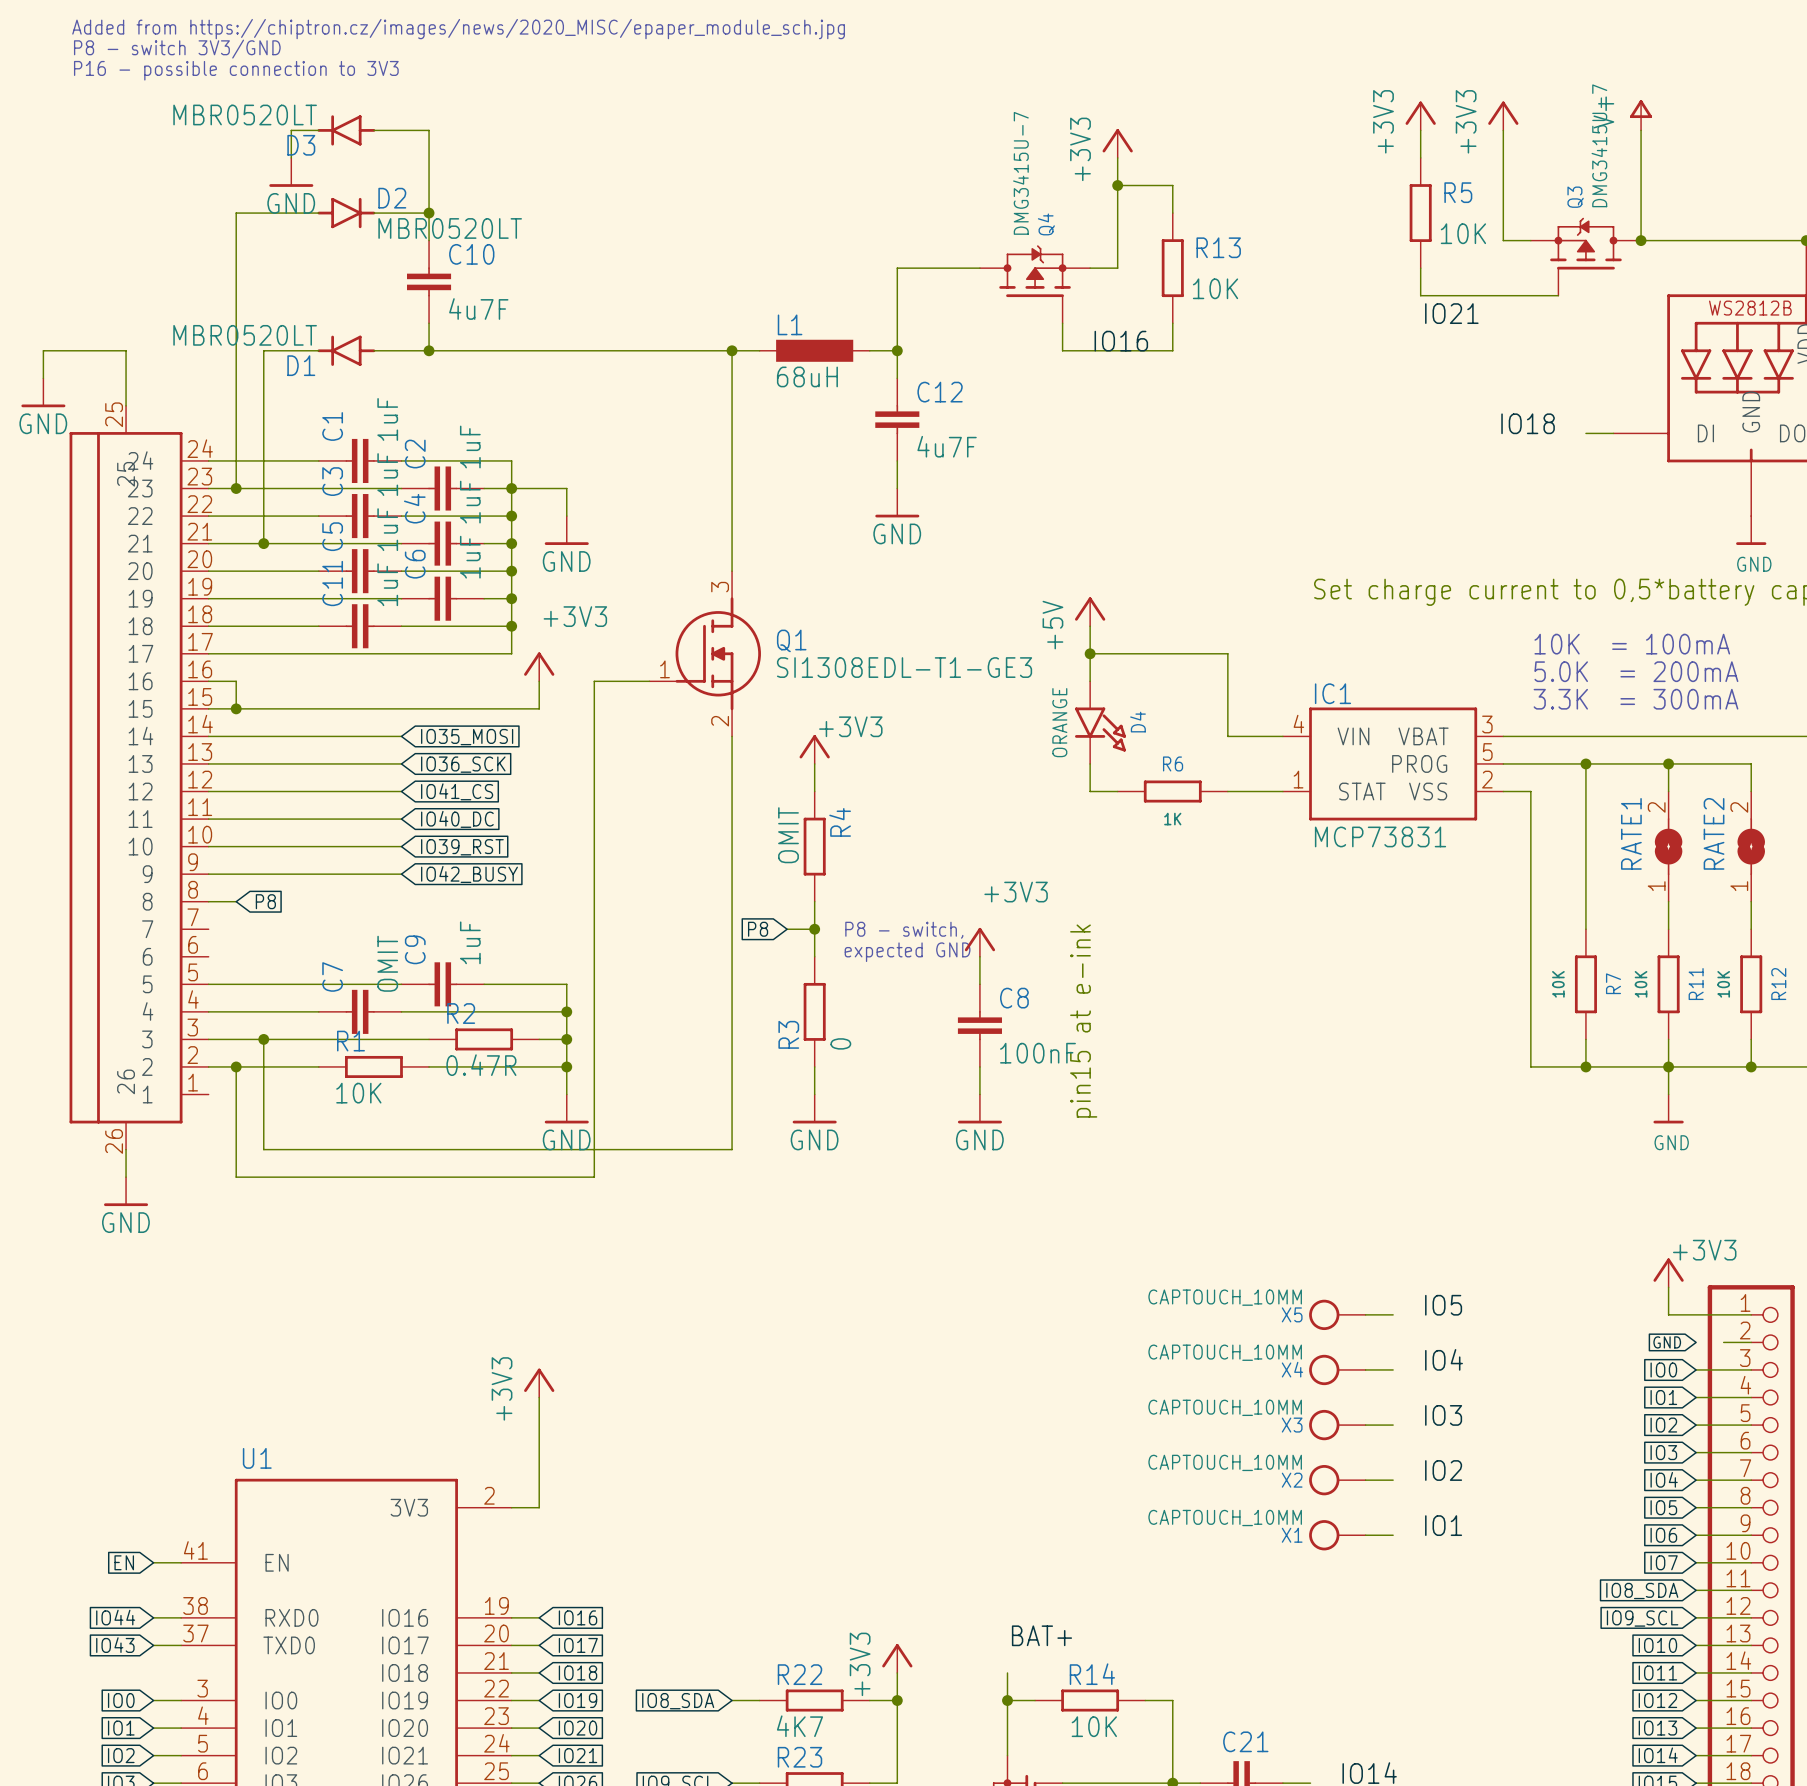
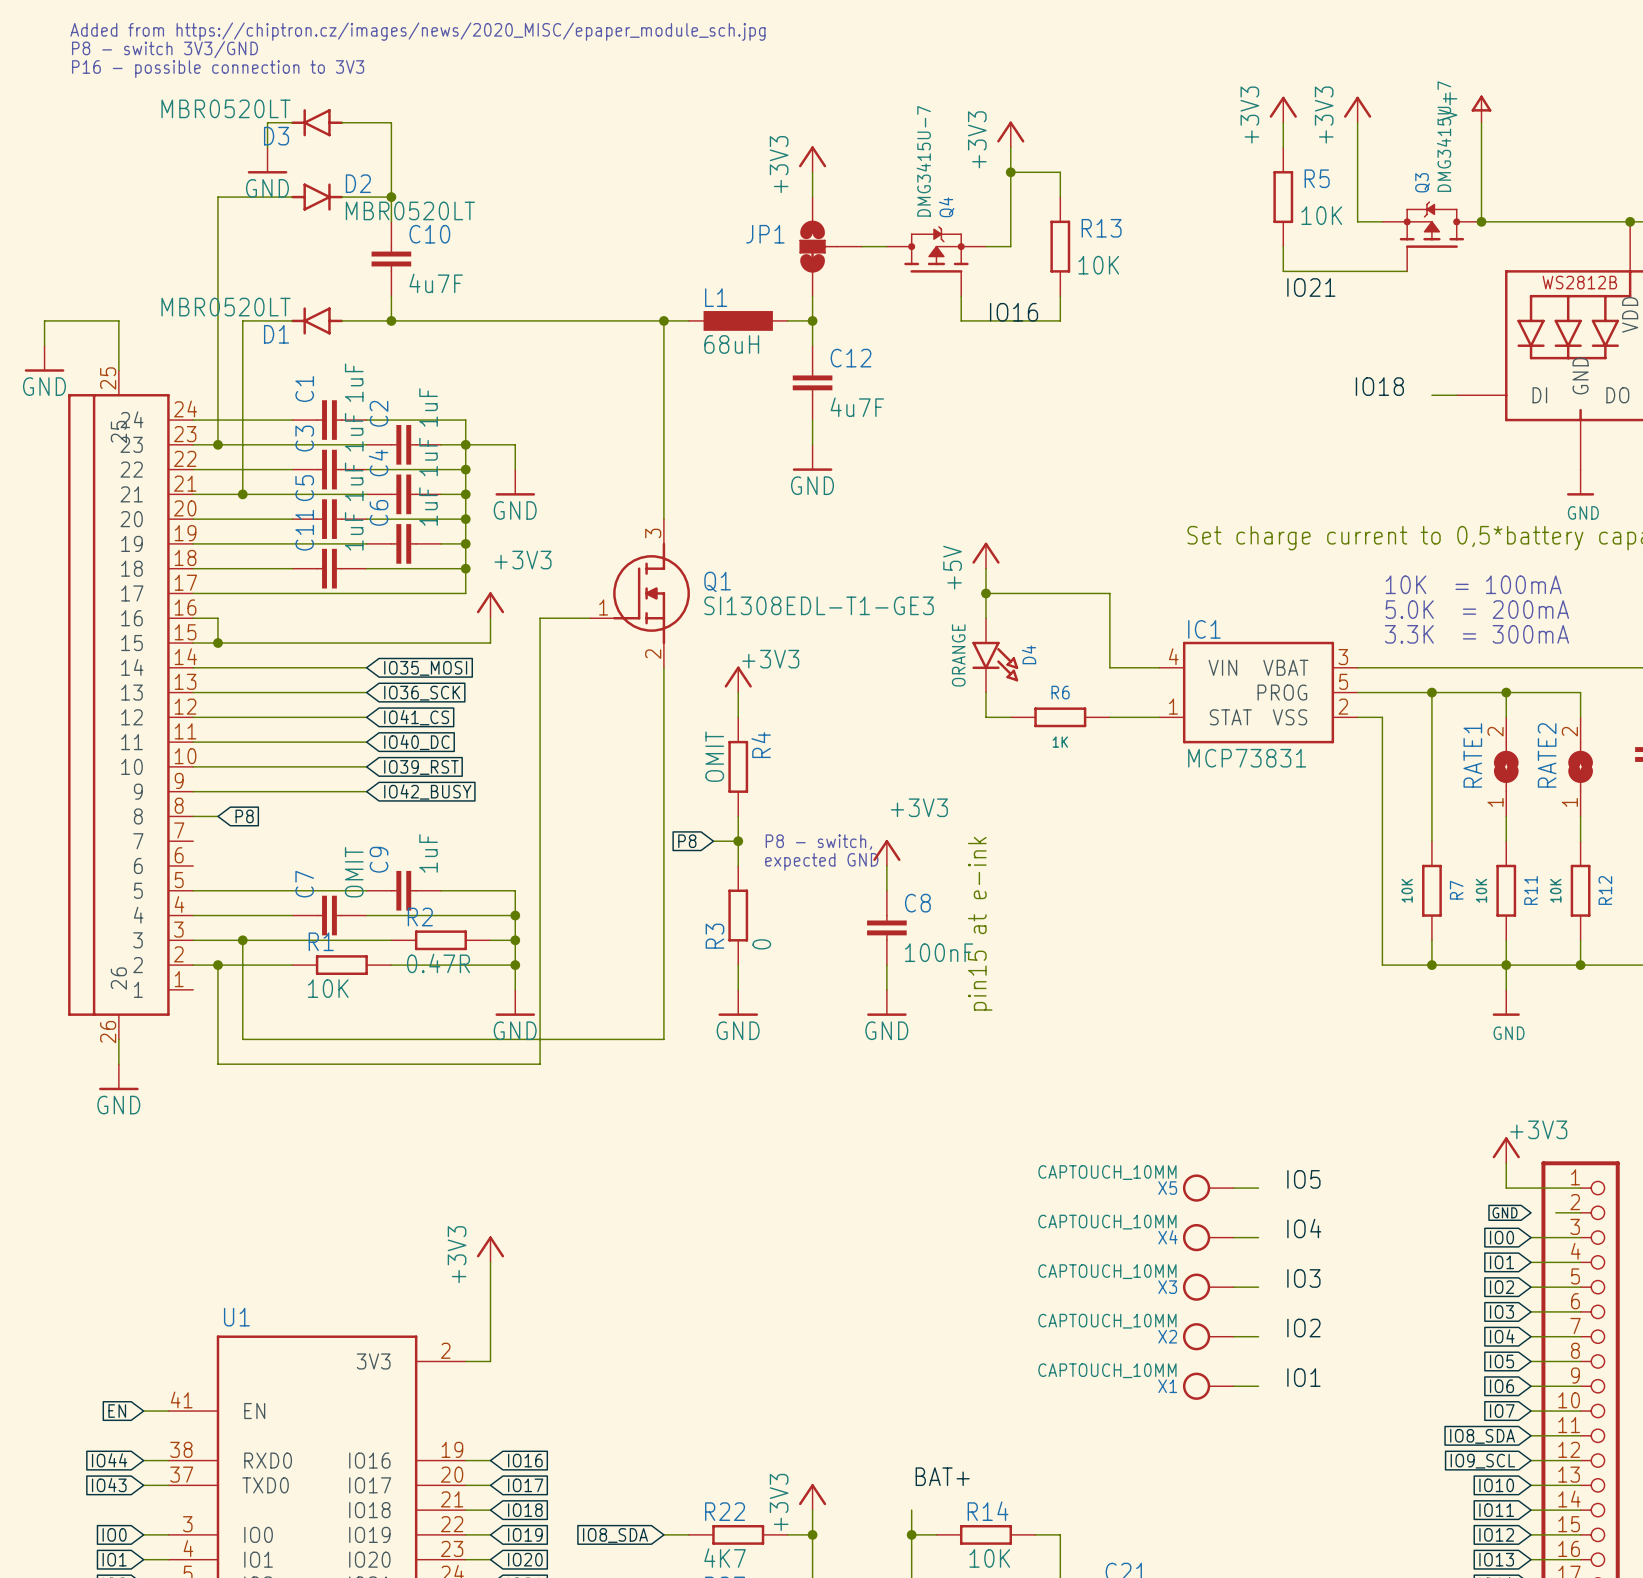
power symbol: none -> +3V3 (812, 159)
wire: none -> (812, 172) (812, 197)
JP1: none -> (830, 246)

